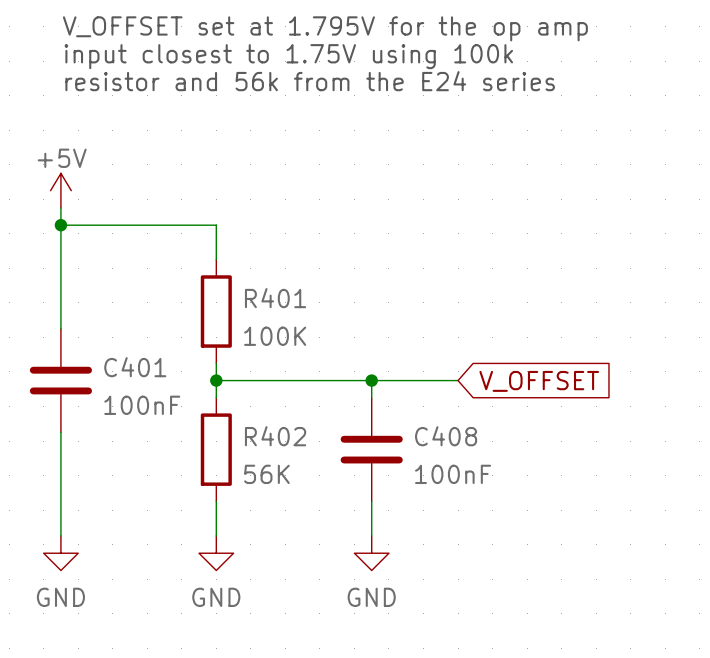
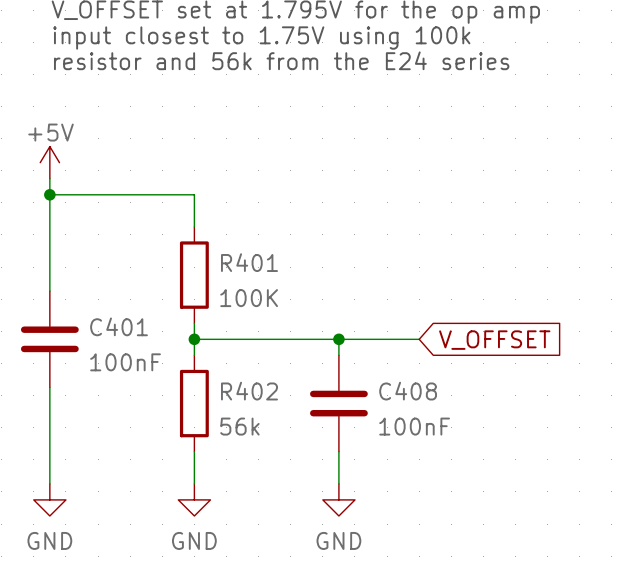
R402 value: 56K (266, 474) -> 56k (239, 426)

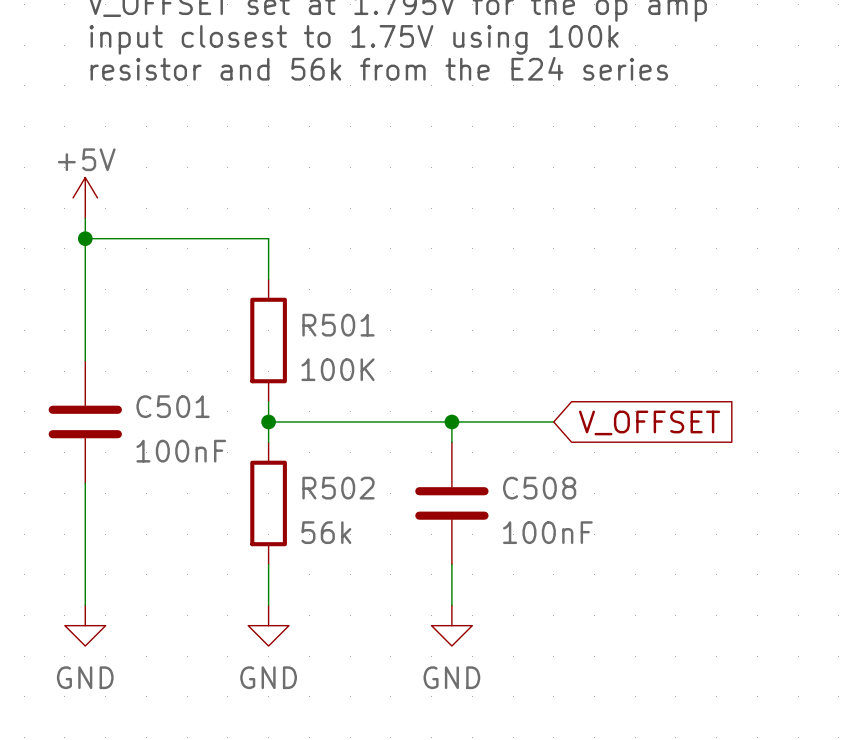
R401 name: R401 (249, 262) -> R501 (338, 325)
C401 name: C401 (119, 326) -> C501 (173, 406)
R402 name: R402 (249, 391) -> R502 (338, 488)
C408 name: C408 (408, 391) -> C508 (539, 488)

